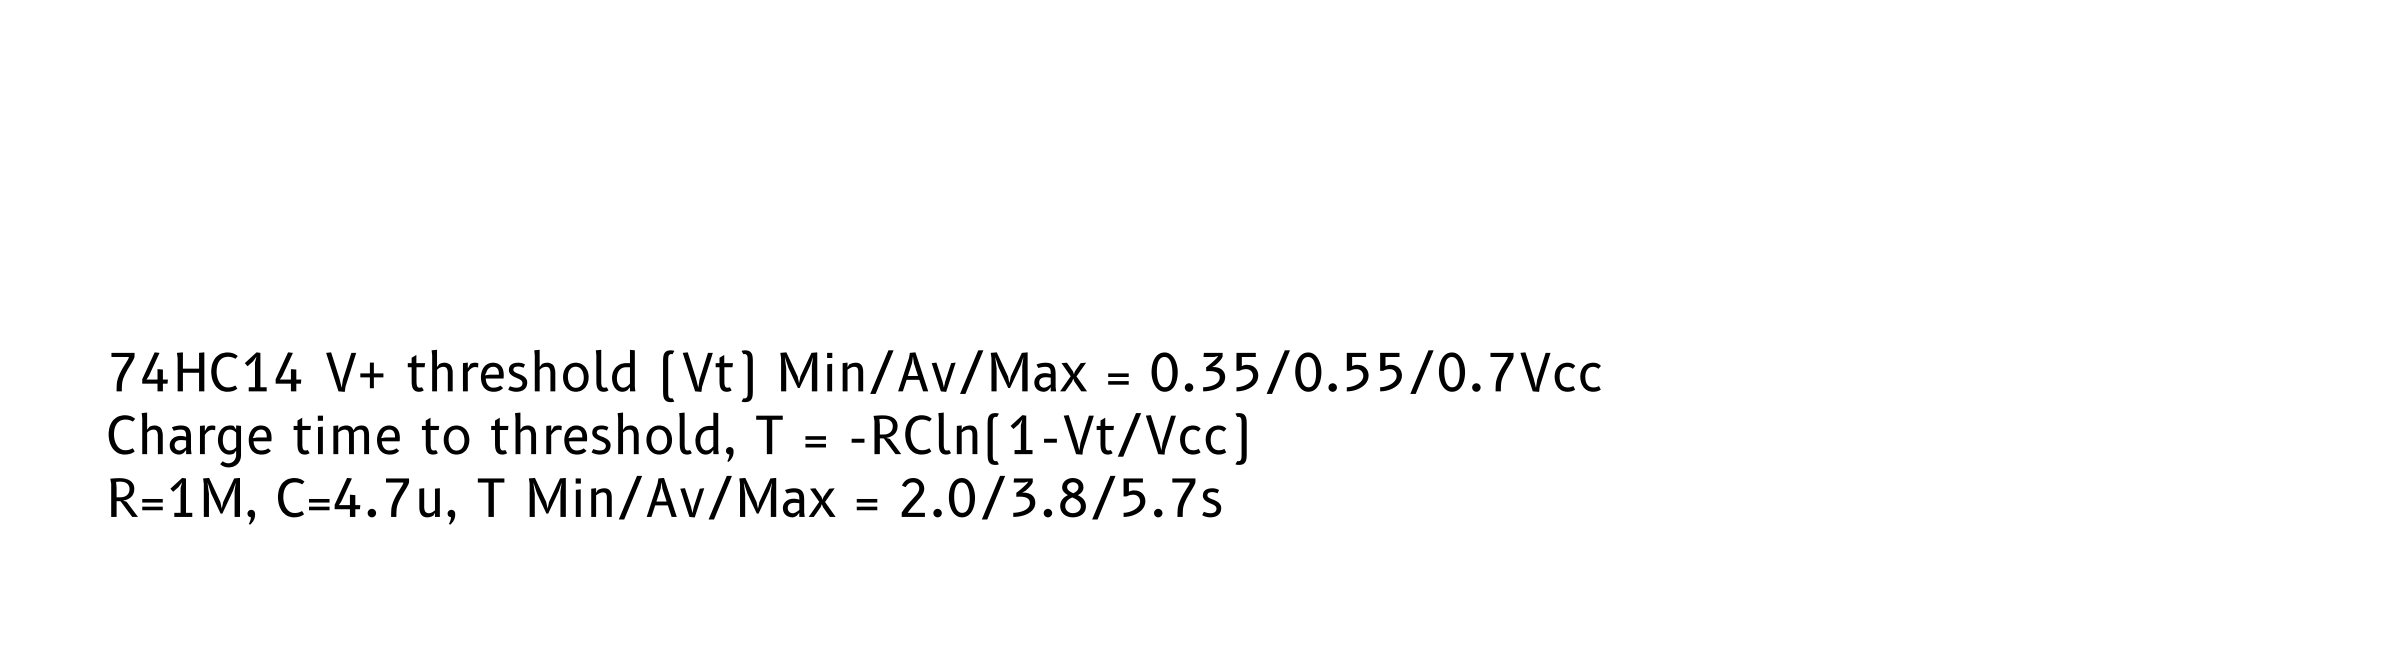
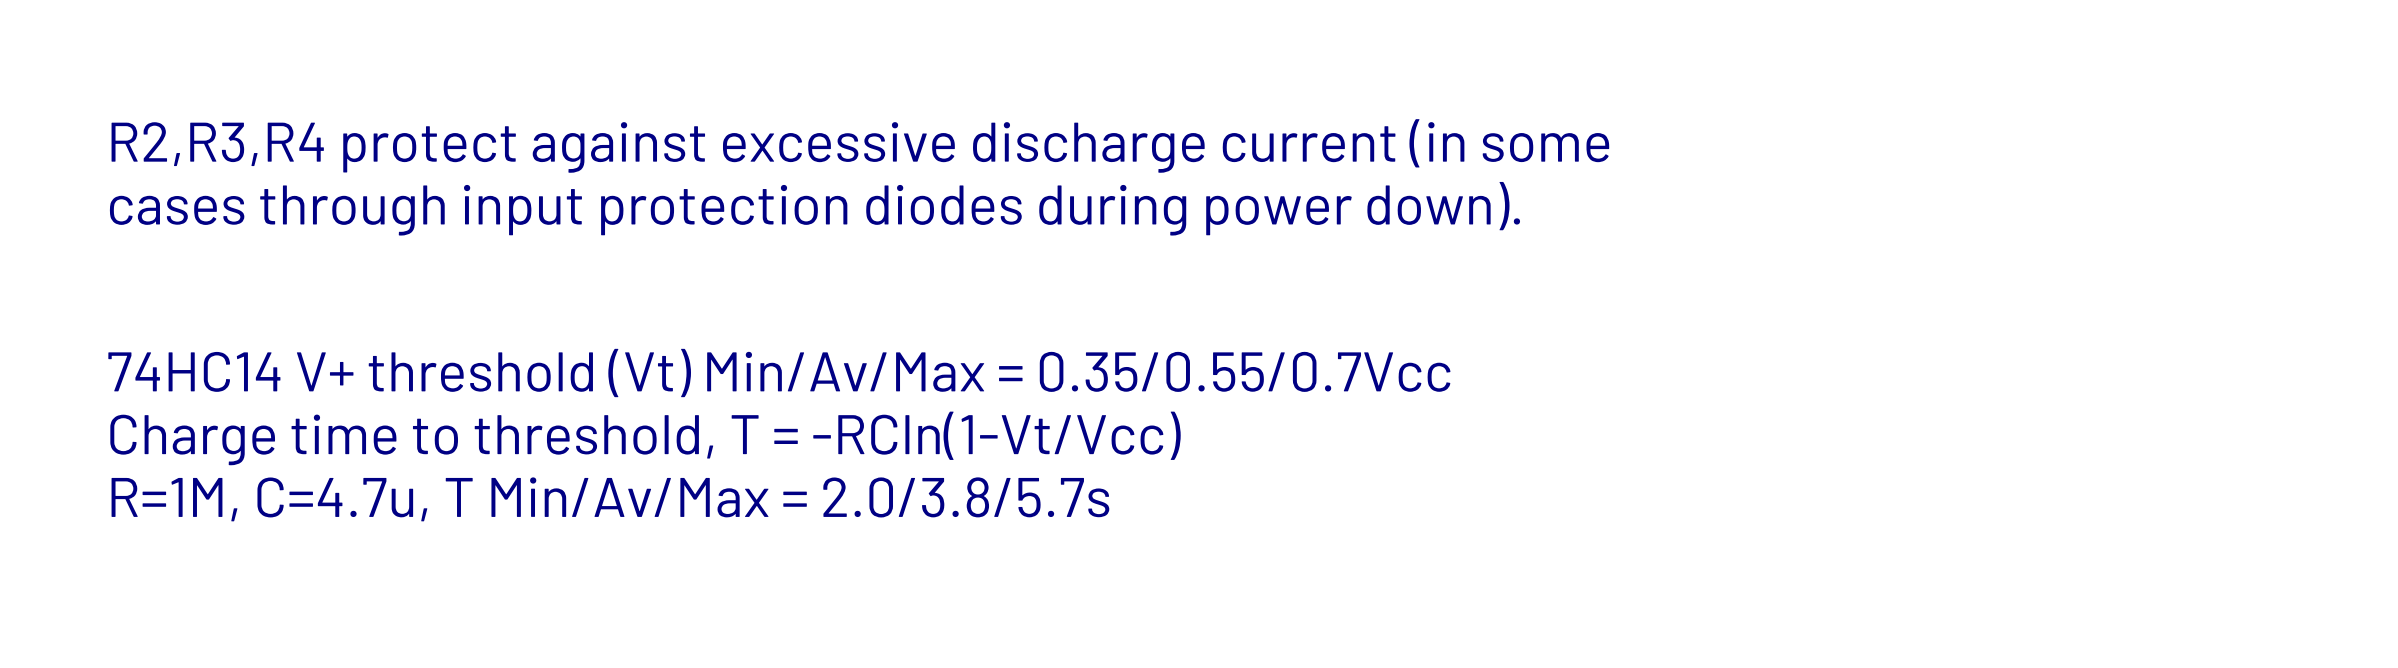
text: none -> R2,R3,R4 protect against excessive discharge current (in some (860, 145)
text: none -> cases through input protection diodes during power down). (814, 208)

